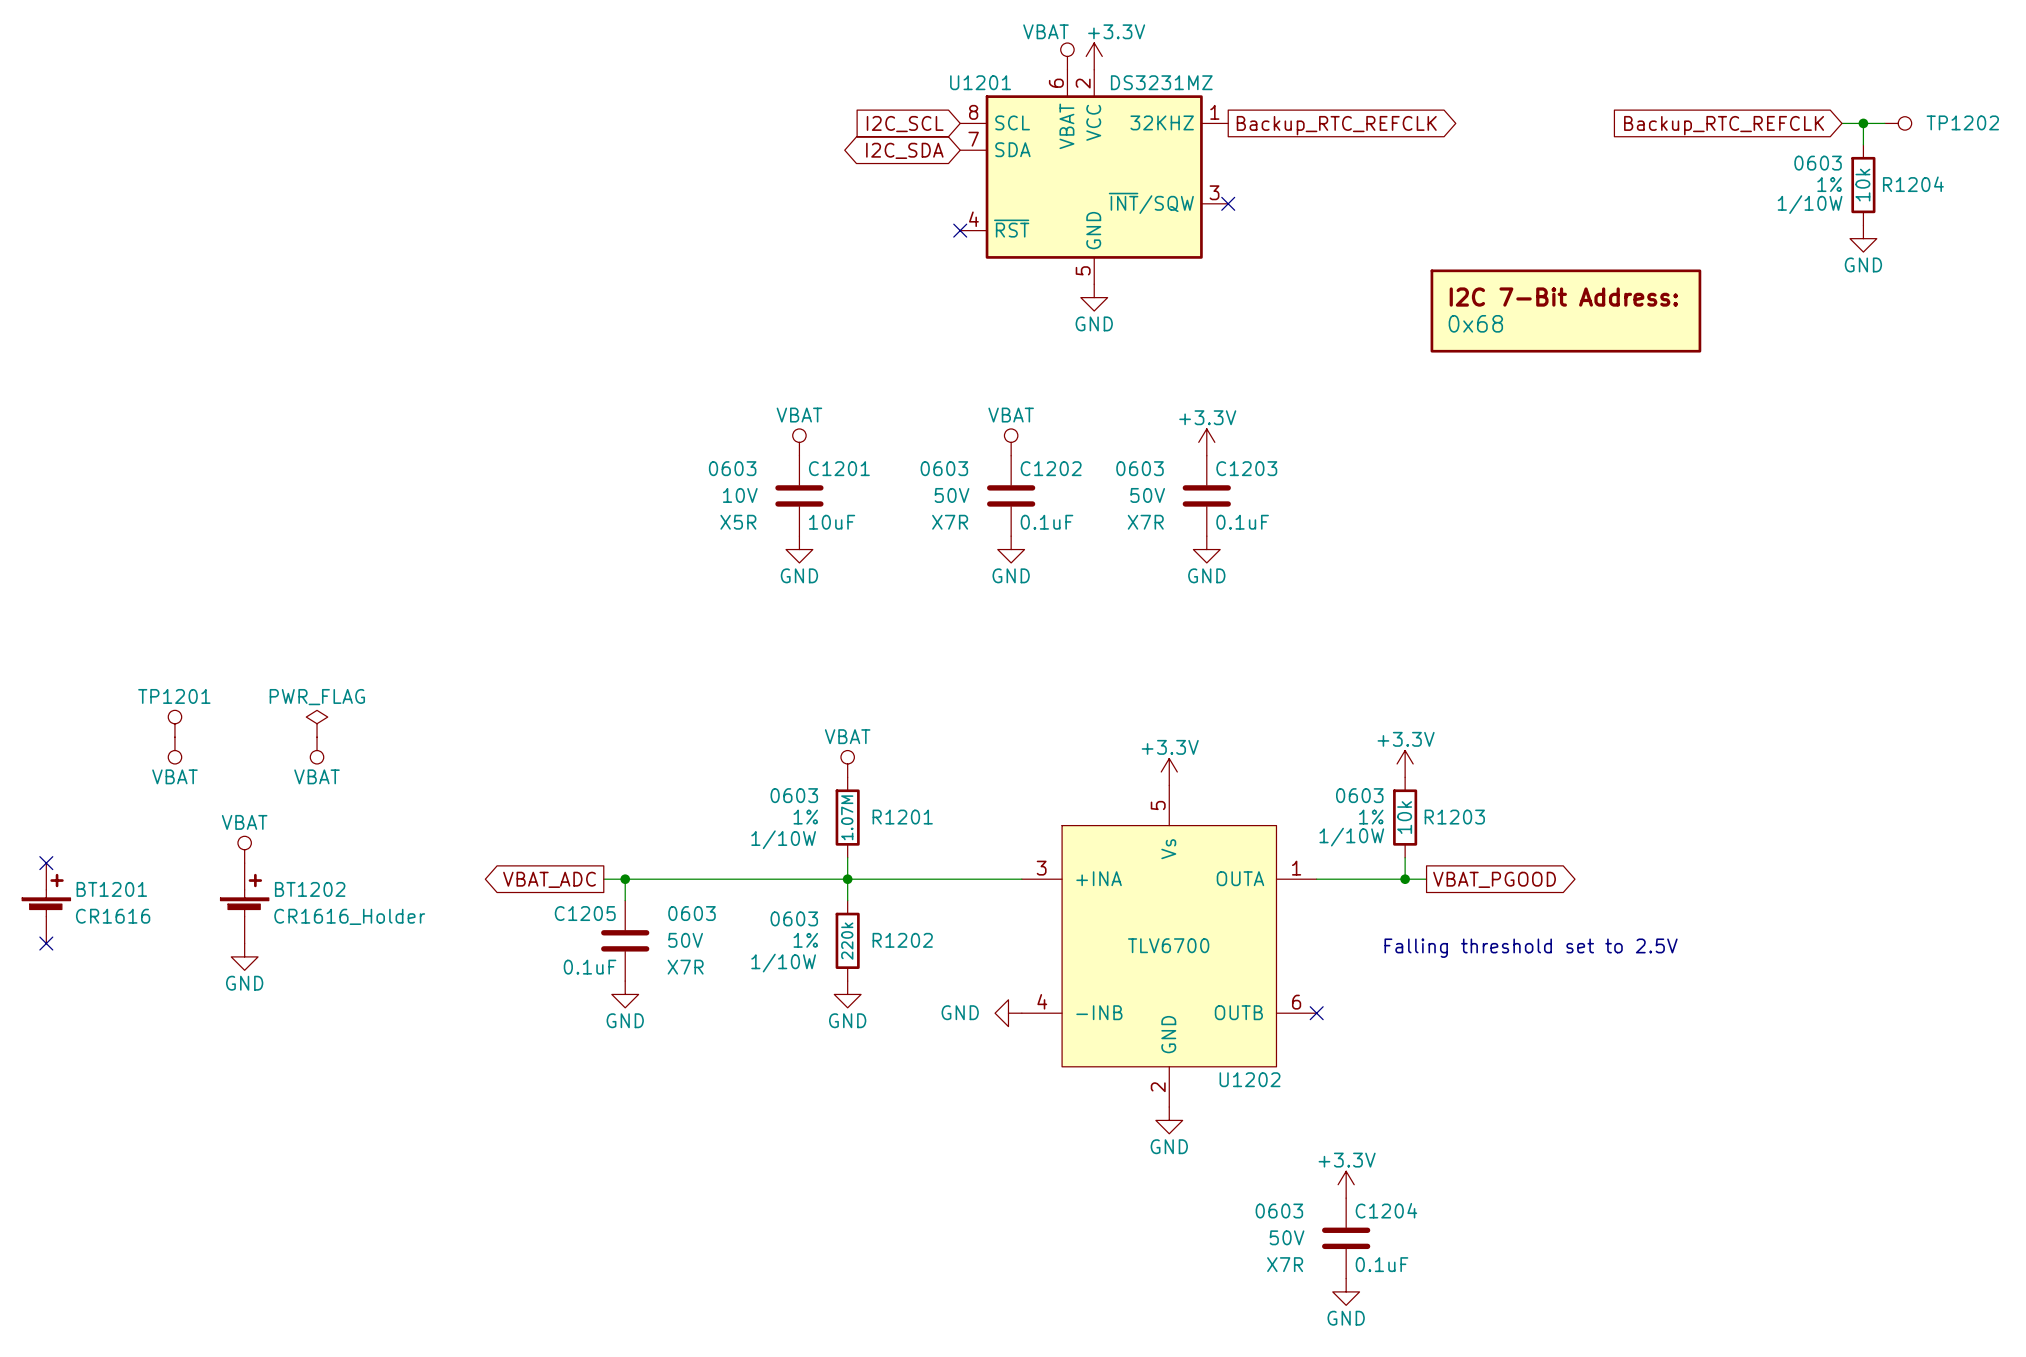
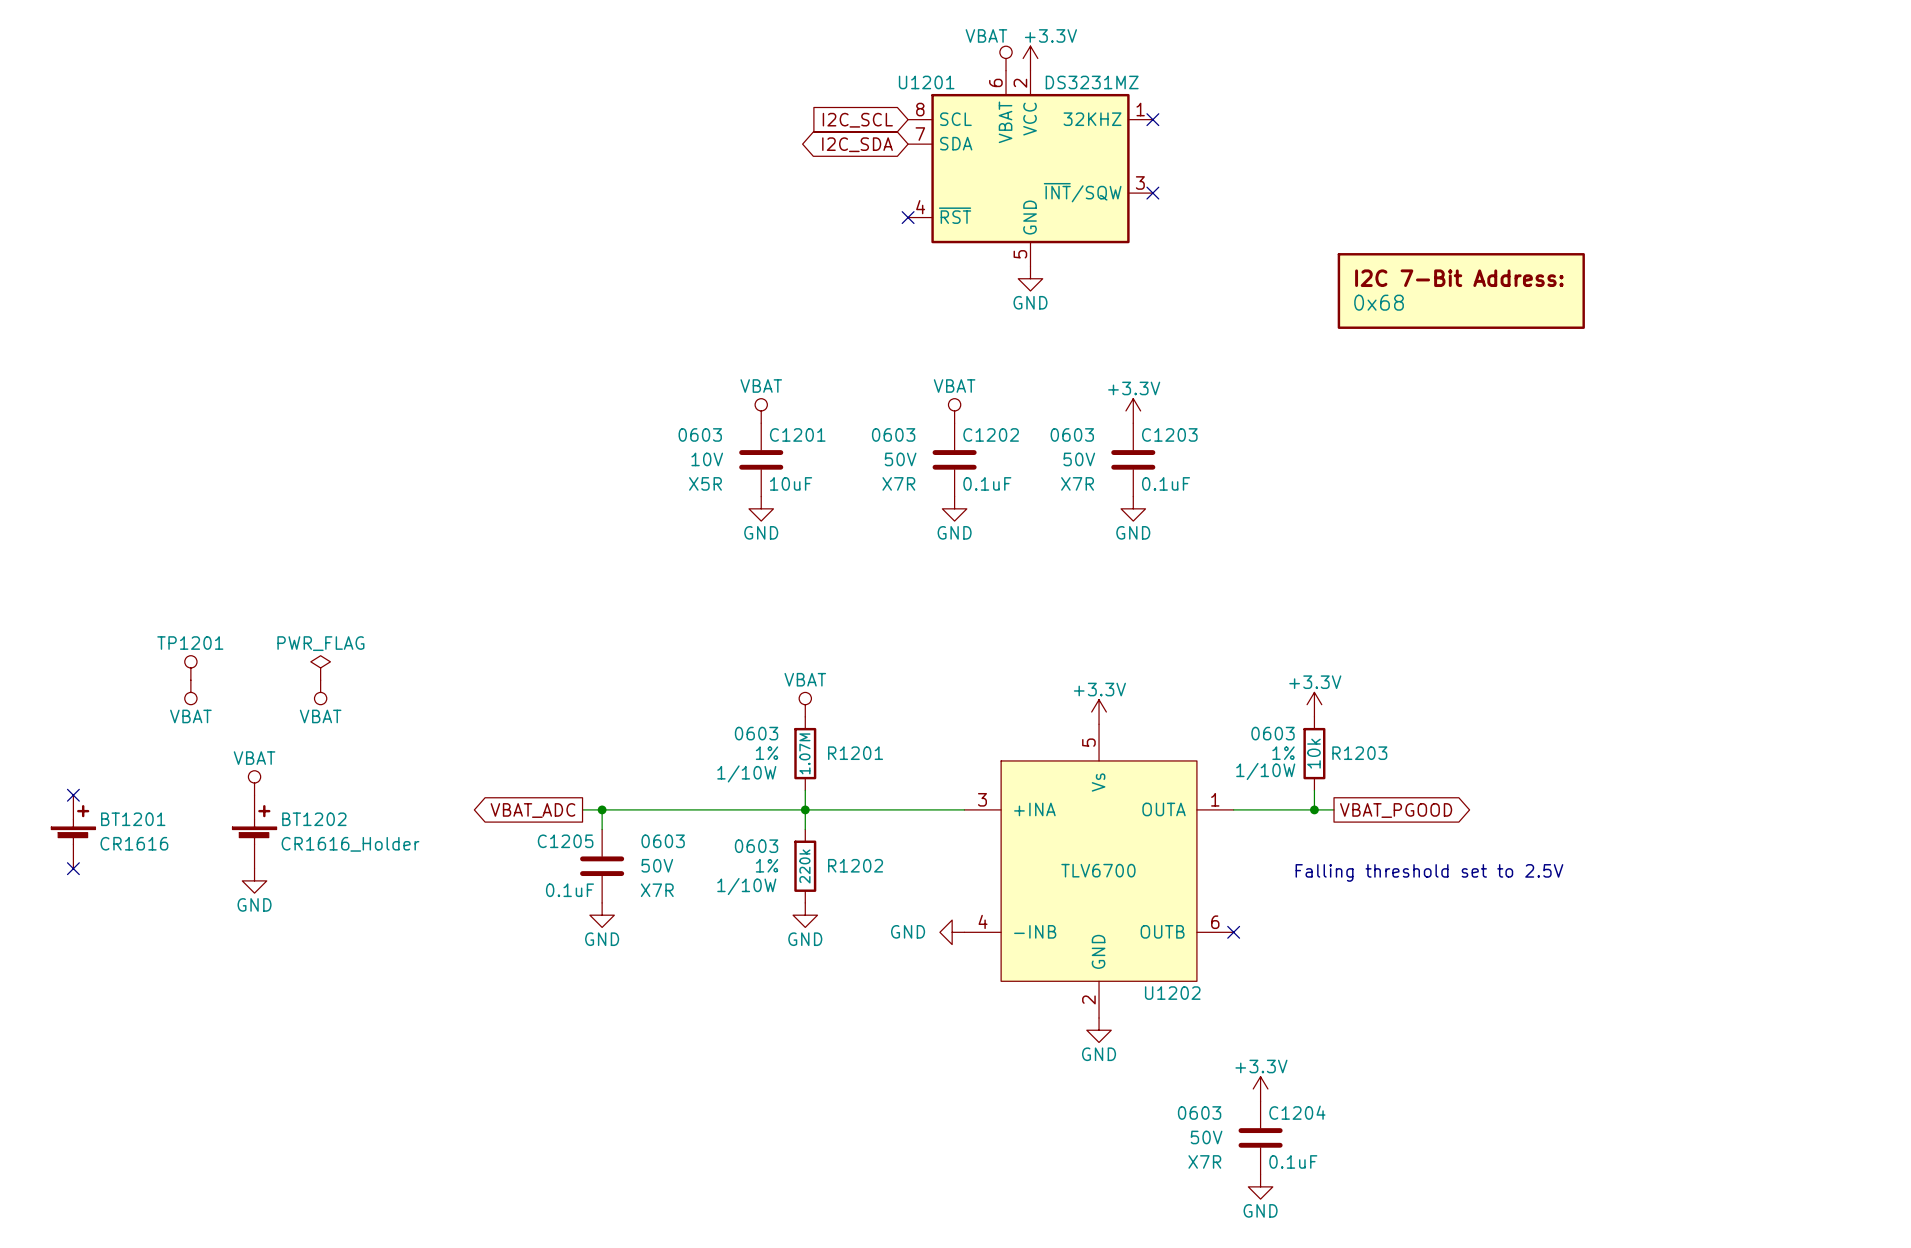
no-connect mark: none -> (1152, 119)
wire: (1841, 123) (1884, 123) -> none
wire: (1863, 123) (1863, 144) -> none
junction: (1863, 123) -> none
TP1202: (1898, 123) -> none
global label: Backup_RTC_REFCLK (1336, 125) -> none
global label: Backup_RTC_REFCLK (1724, 125) -> none
R1204: 10k (1863, 185) -> none
power symbol: GND (1863, 238) -> none

